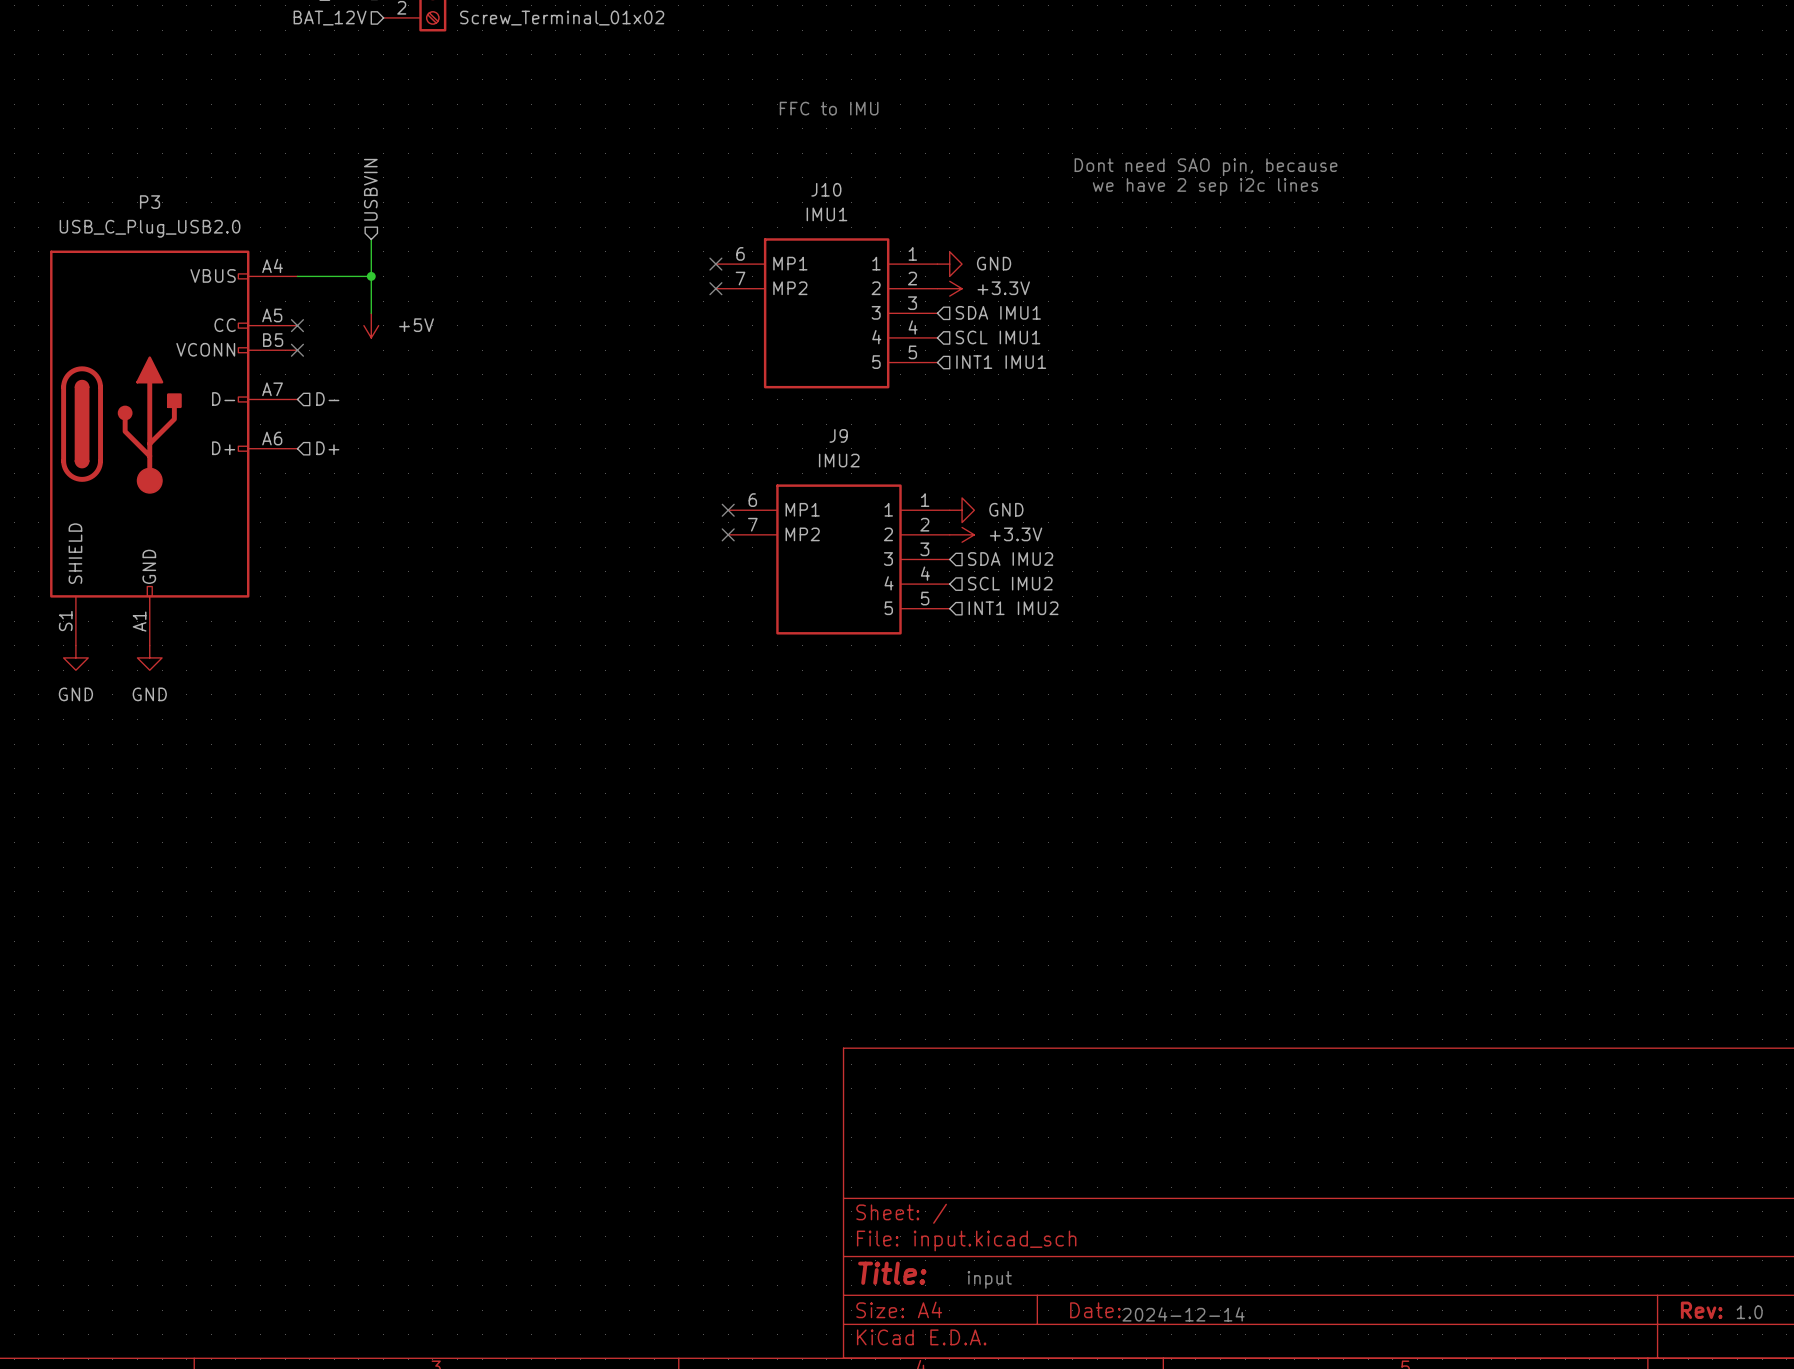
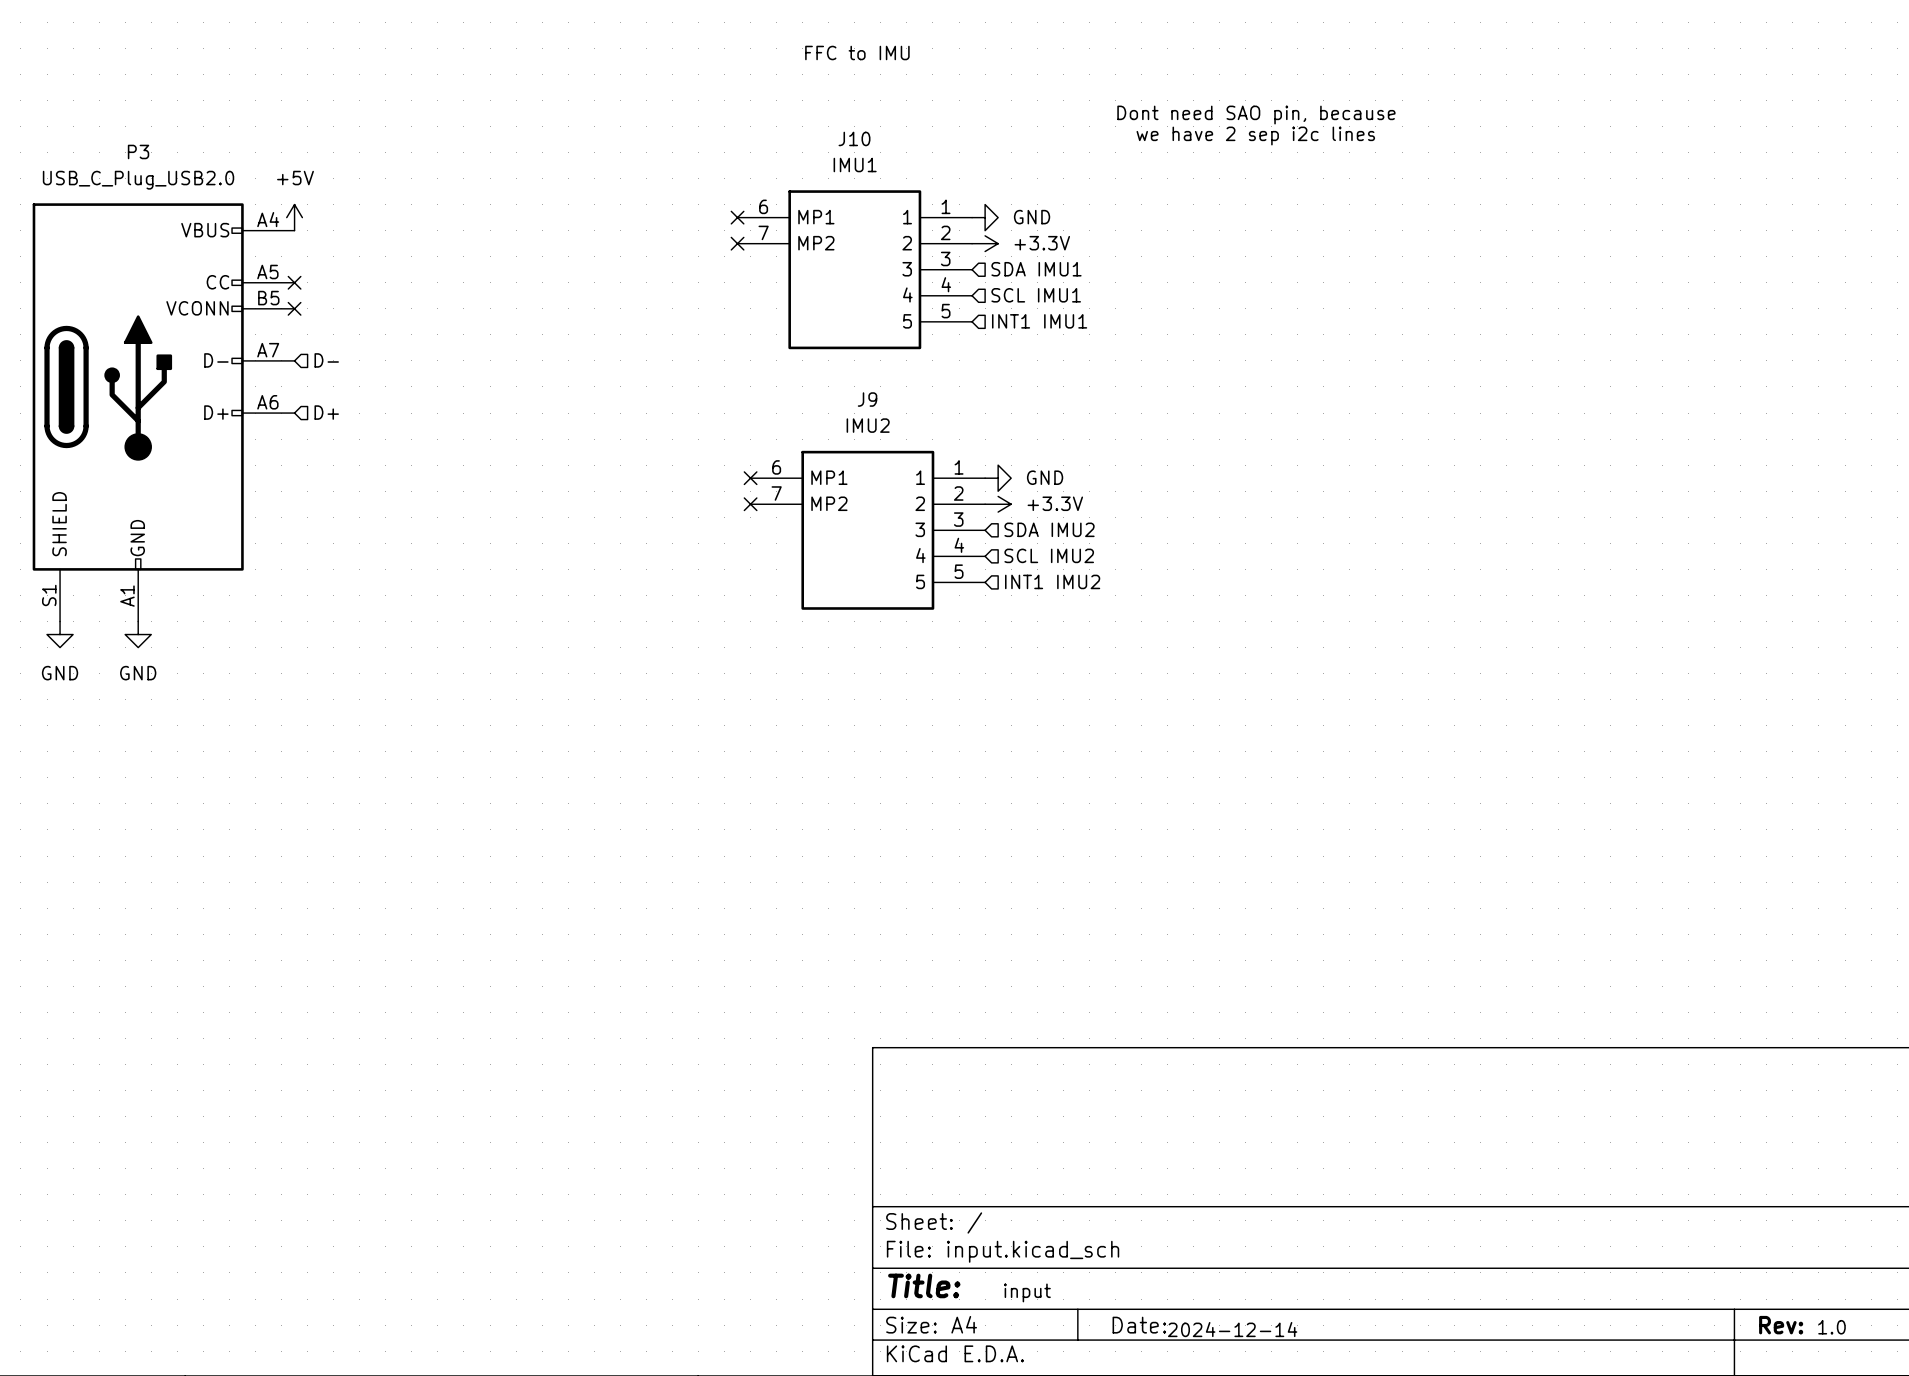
hierarchical label: USBVIN (370, 189) -> none
wire: (371, 239) (371, 313) -> none
wire: (297, 276) (371, 276) -> none
junction: (371, 276) -> none
power symbol rotation: 0° (371, 325) -> 180° (294, 217)
power symbol position: +5V (371, 325) -> +5V (294, 217)
power symbol text position: +5V (416, 325) -> +5V (295, 178)

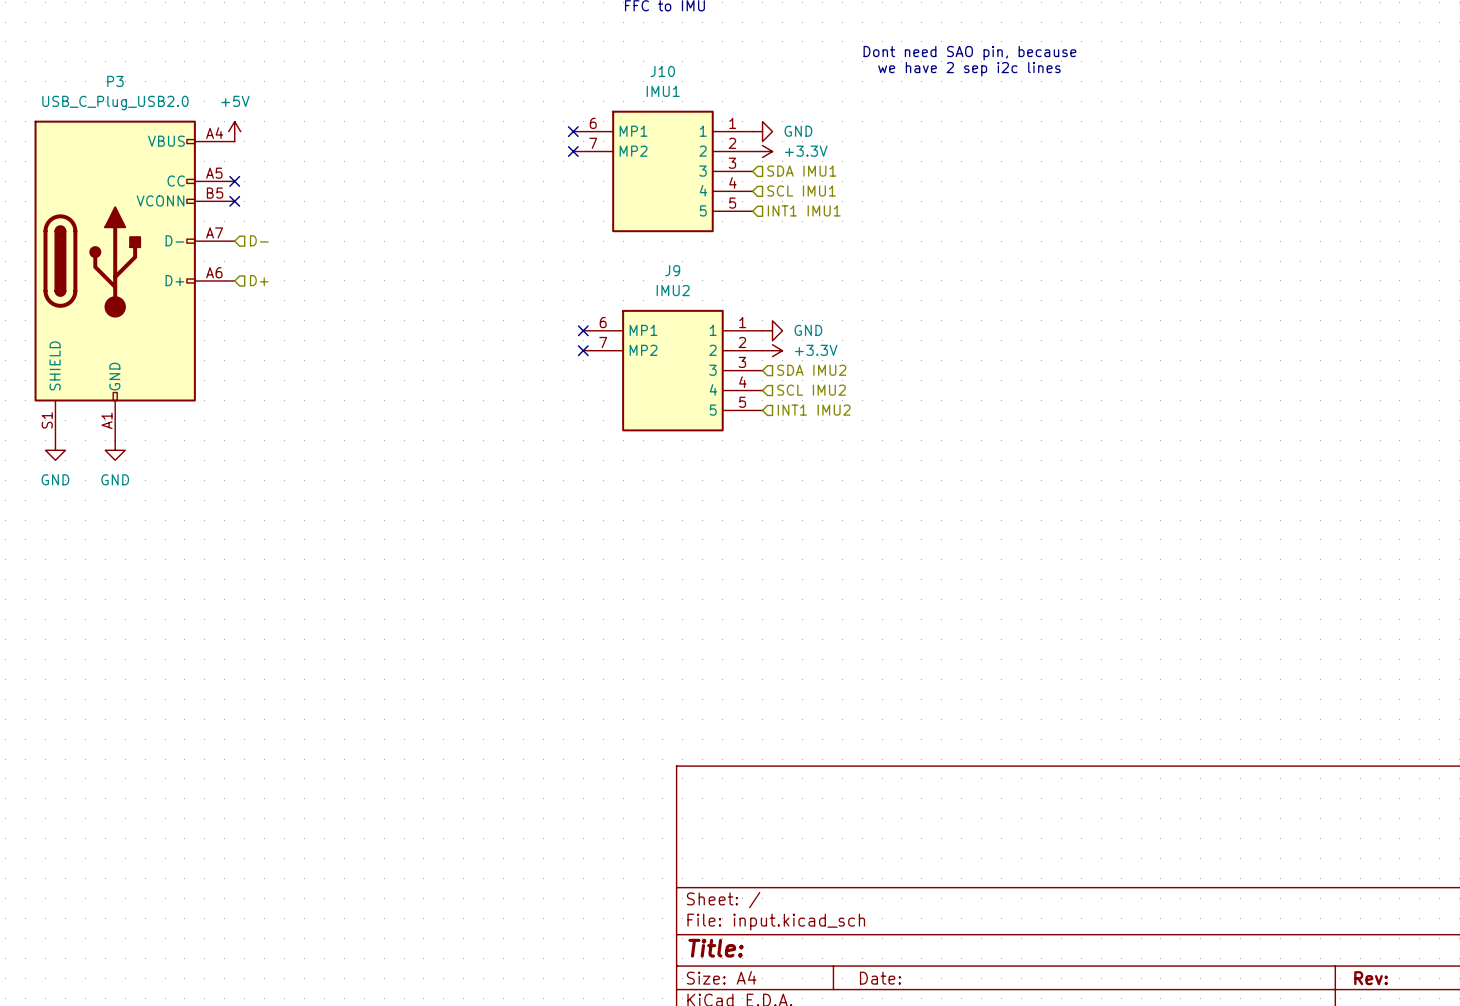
text: input (1027, 1292) -> none
text: 1.0 (1832, 1327) -> none
text: 2024-12-14 (1232, 1329) -> none

